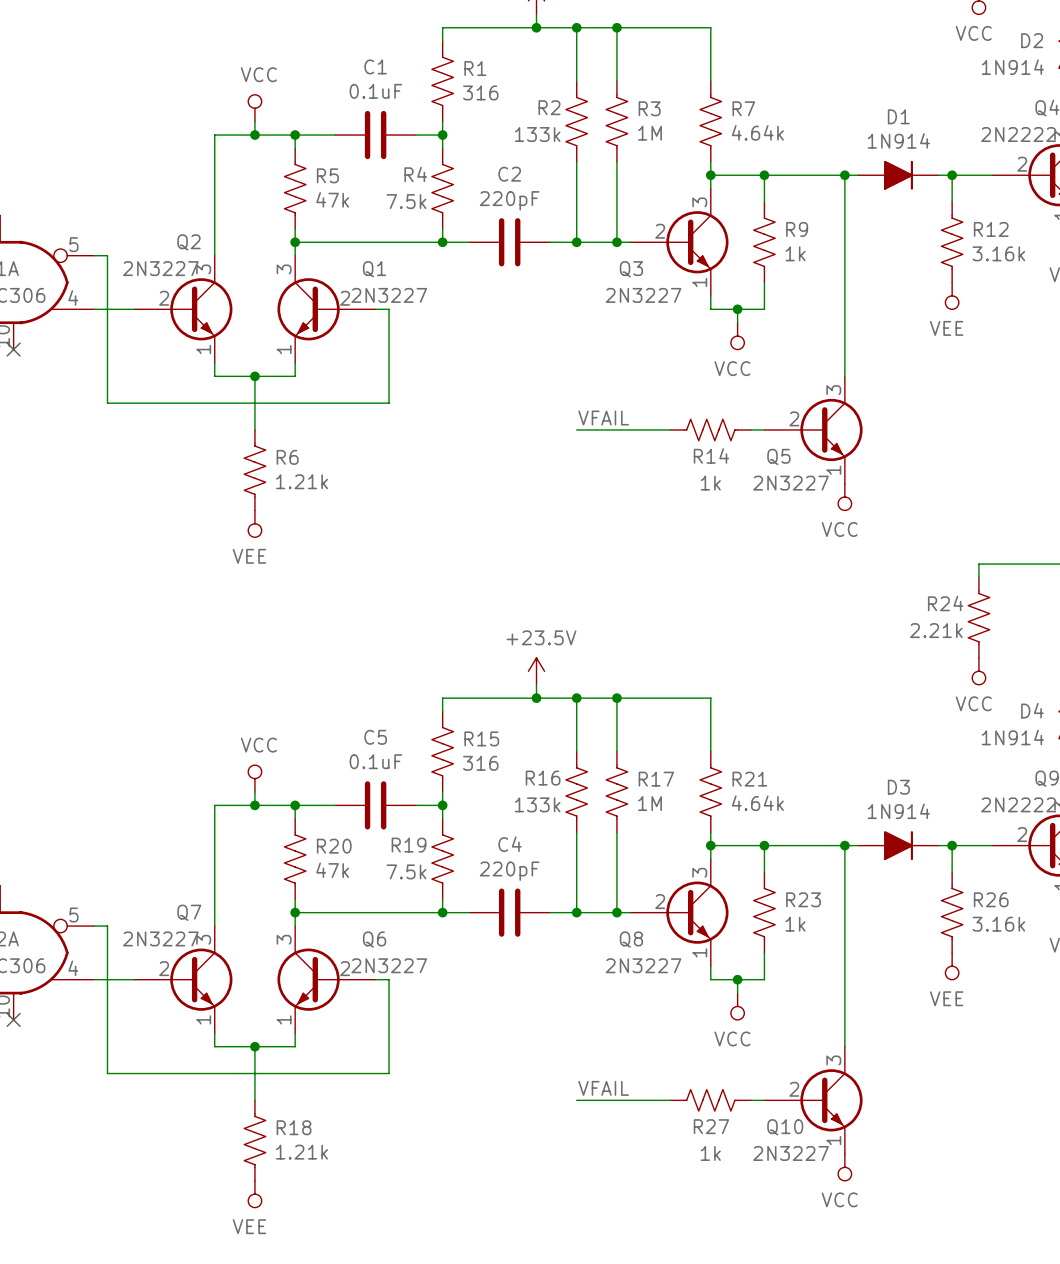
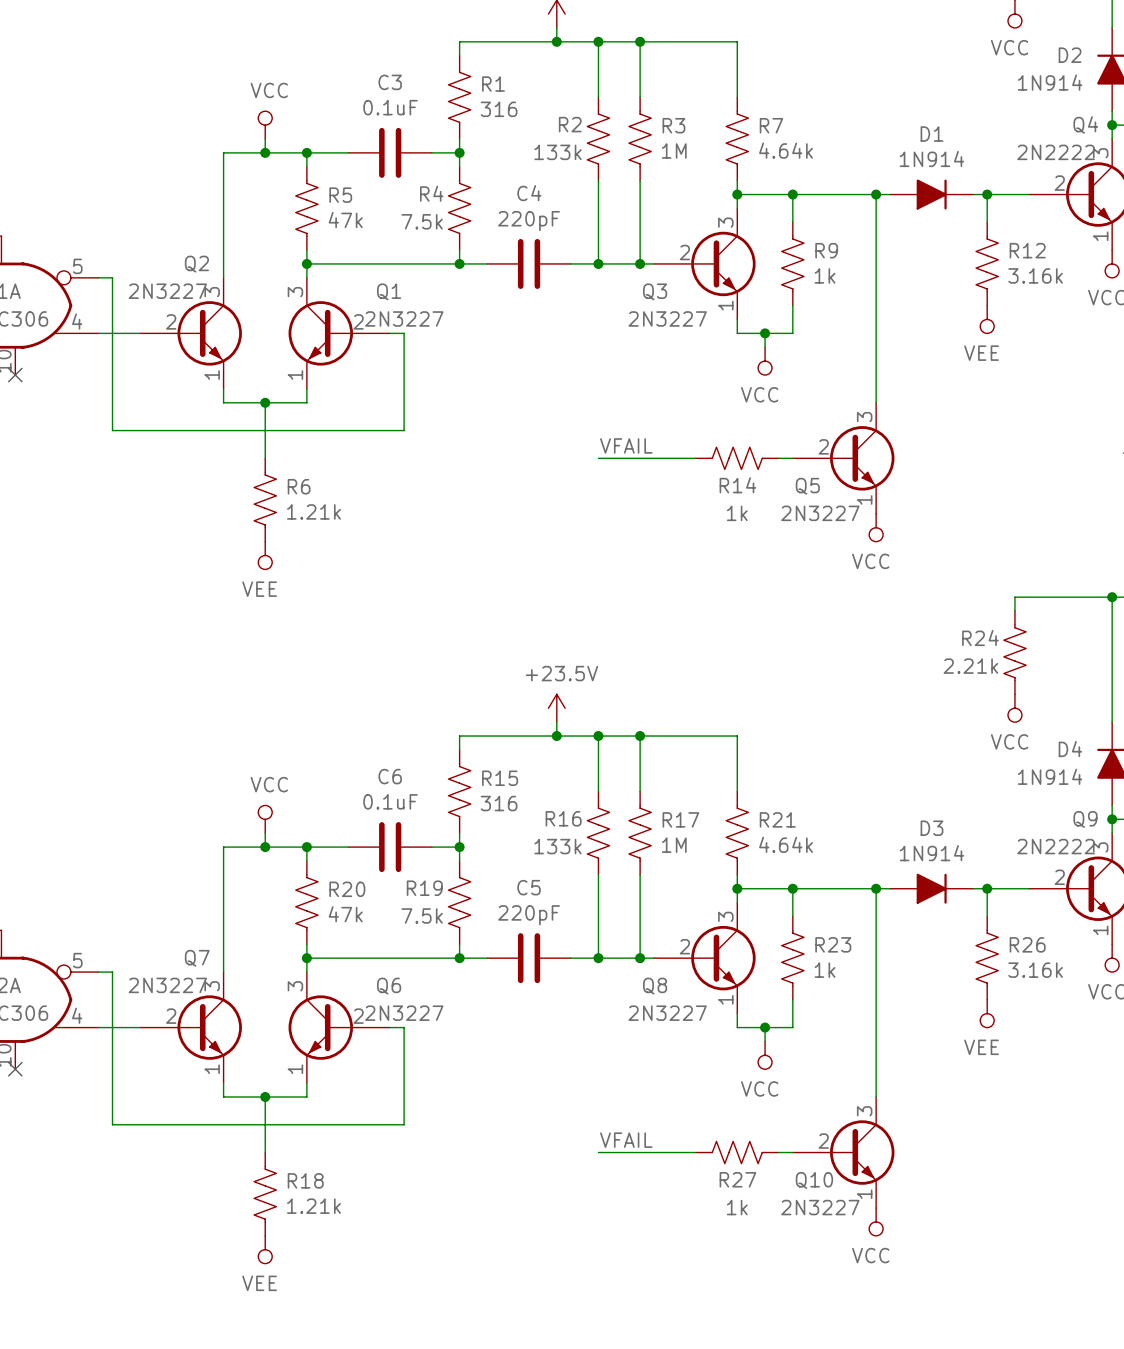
C1 name: C1 (375, 66) -> C3 (390, 82)
C2 name: C2 (509, 174) -> C4 (529, 193)
C5 name: C5 (375, 737) -> C6 (390, 776)
C4 name: C4 (510, 844) -> C5 (529, 887)

